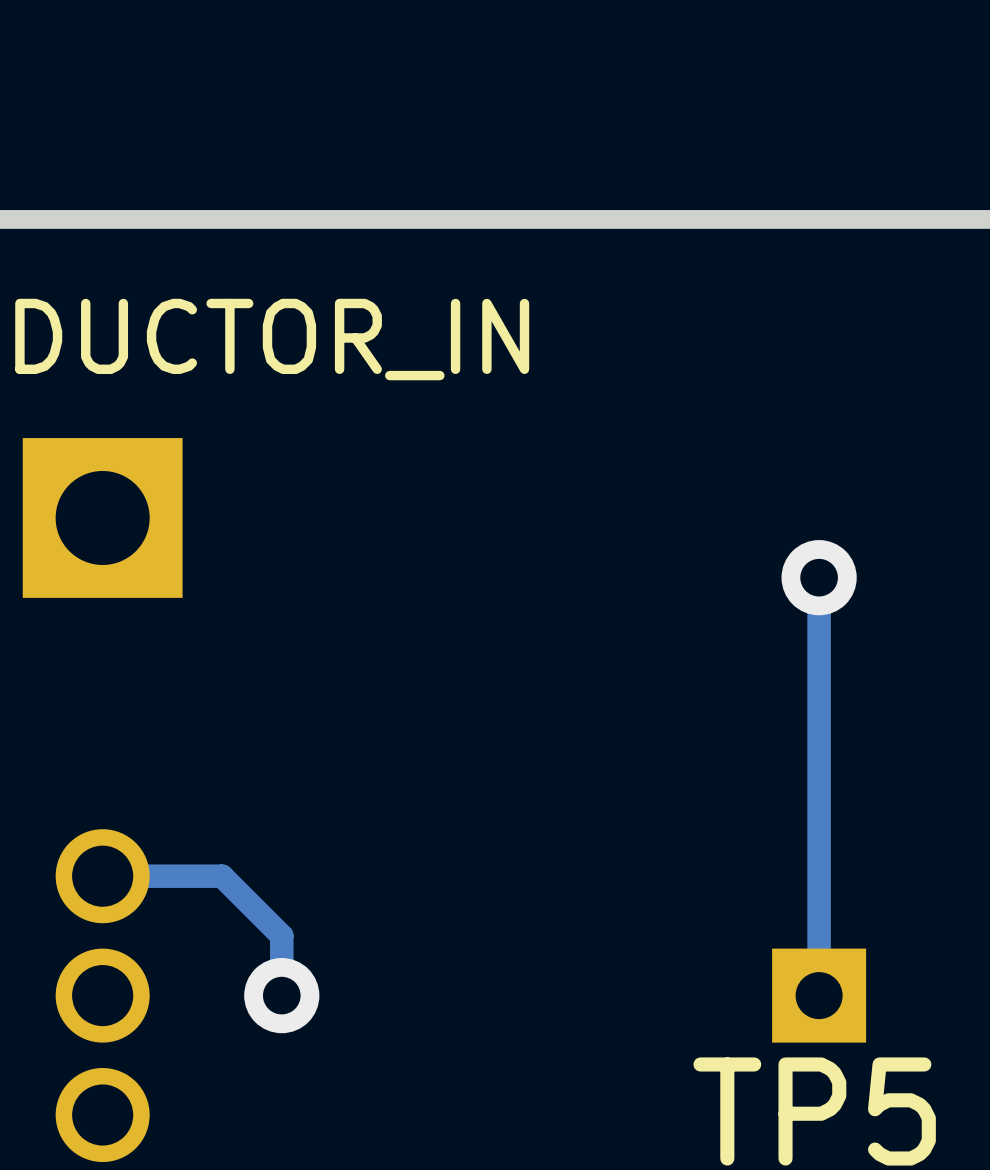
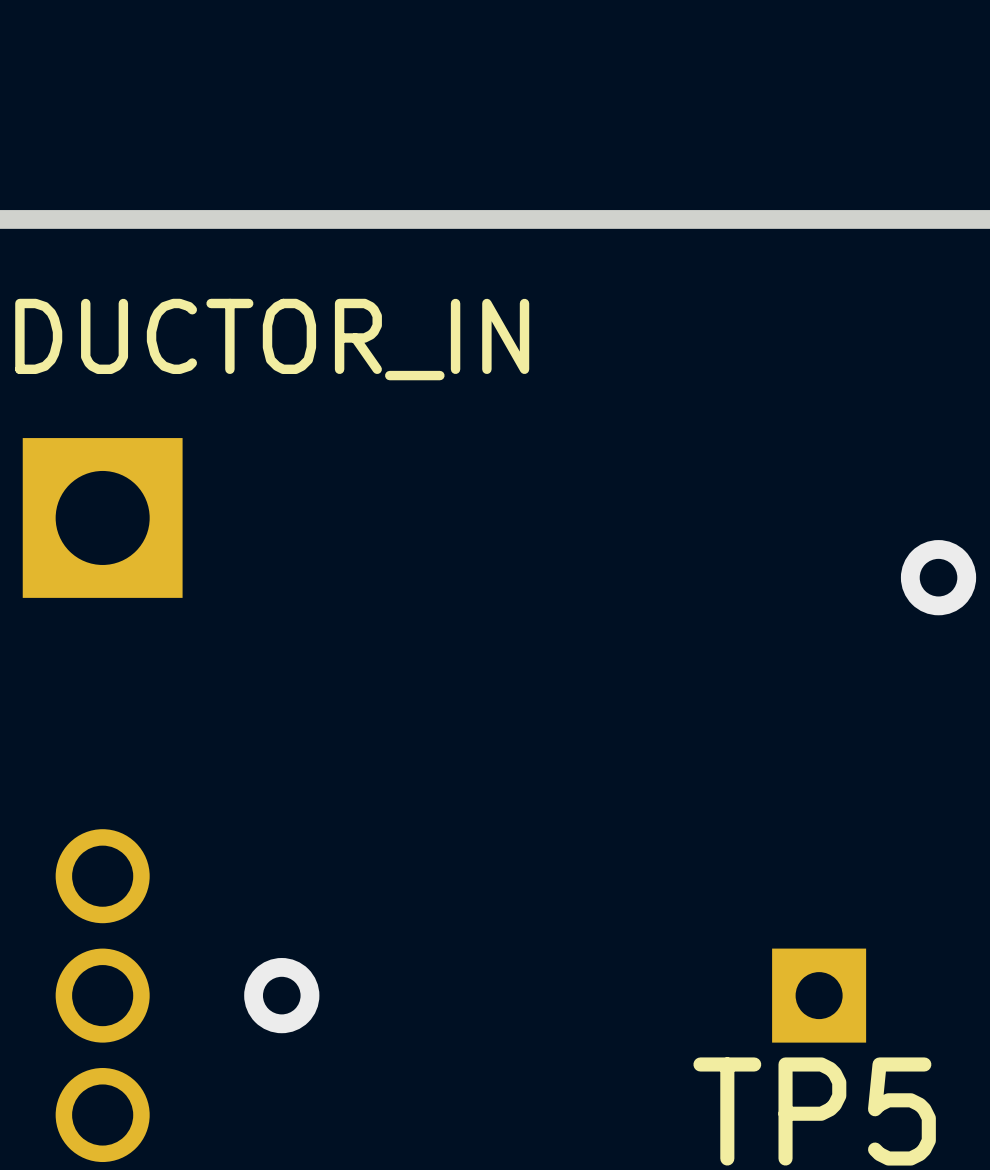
track: (819, 577) (819, 995) -> none
via: (819, 577) -> none
via: none -> (938, 577)
track: (102, 876) (222, 876) (281, 935) (281, 995) -> none

